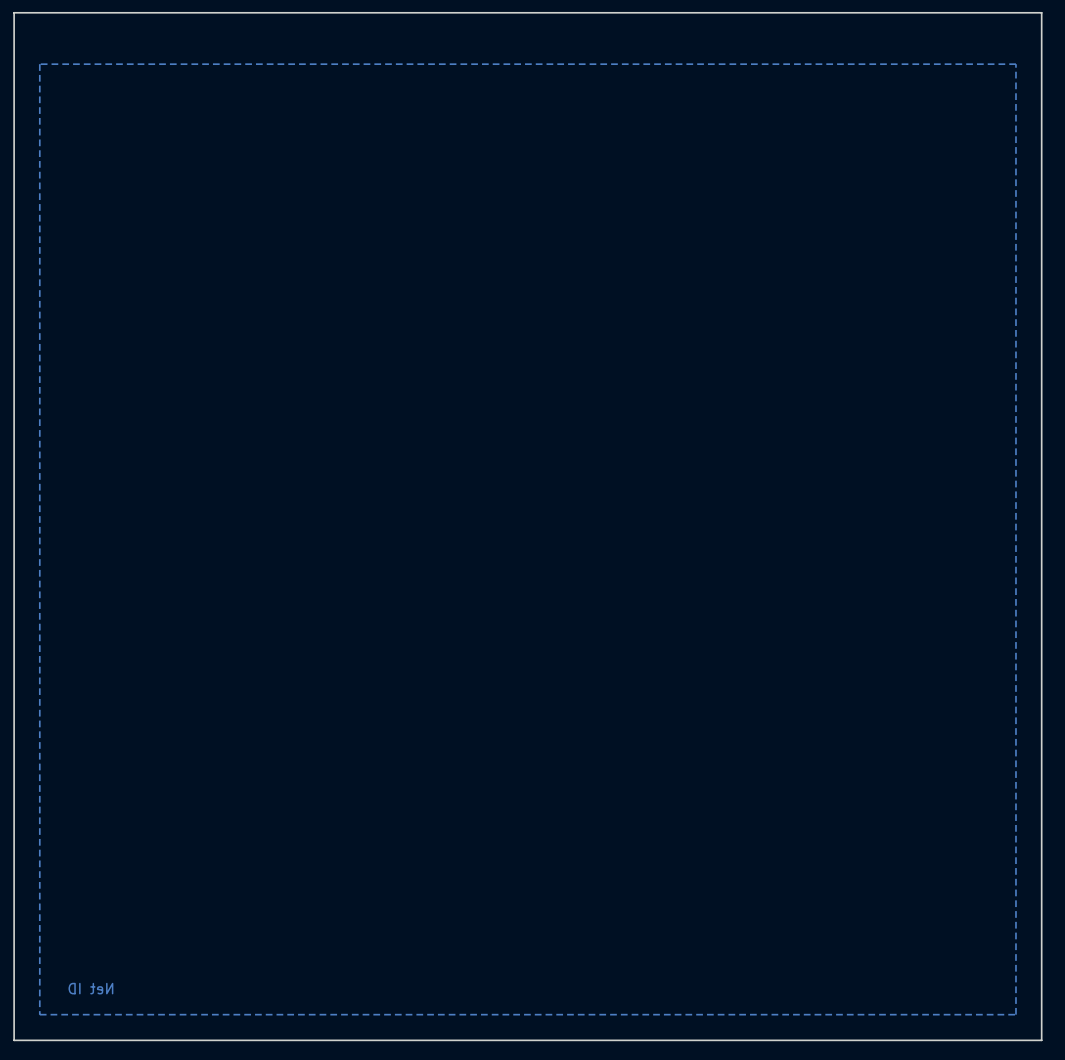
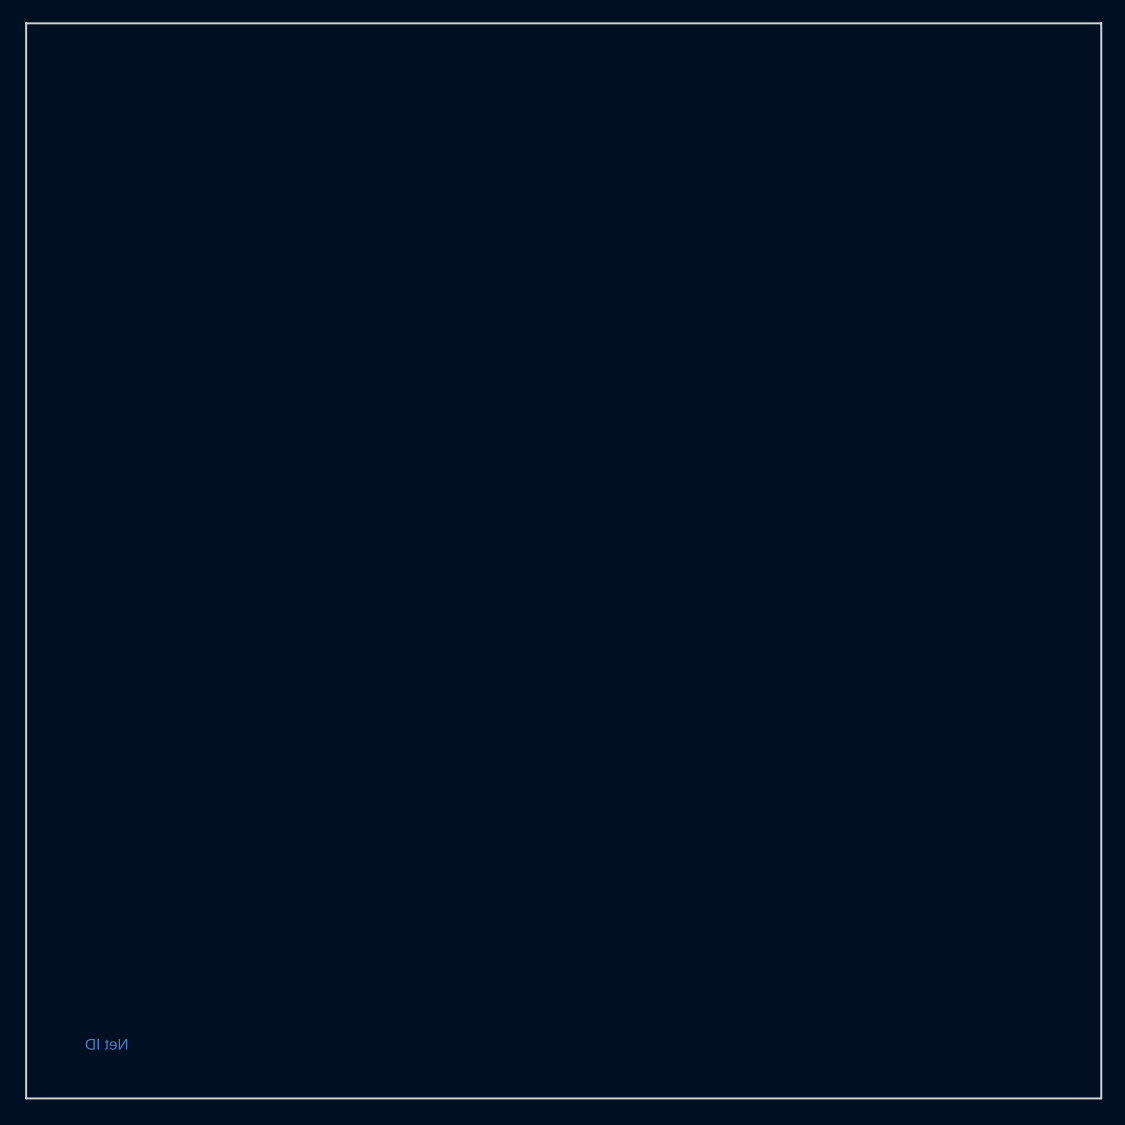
bottom zone outline: (1015, 64) (1015, 1014) (39, 1014) (39, 64) (1015, 64) -> none

